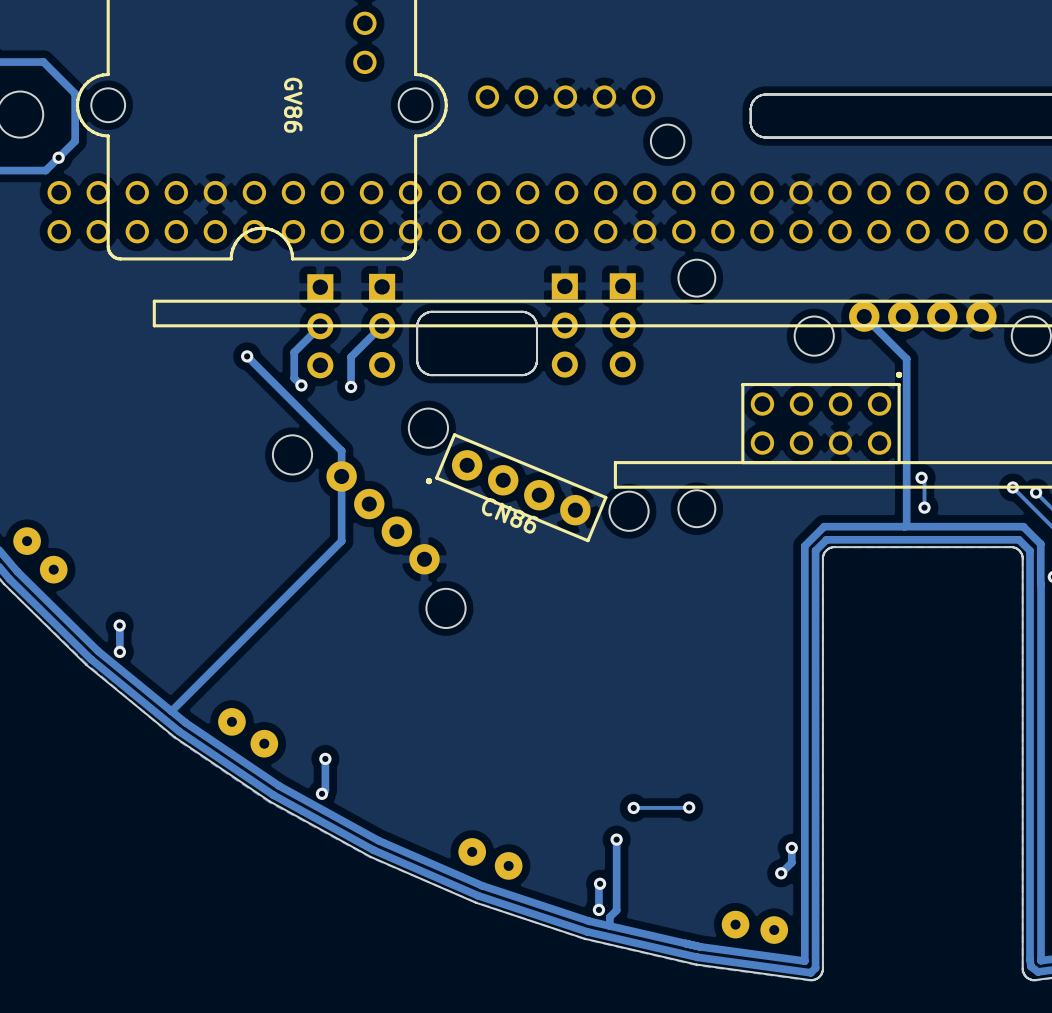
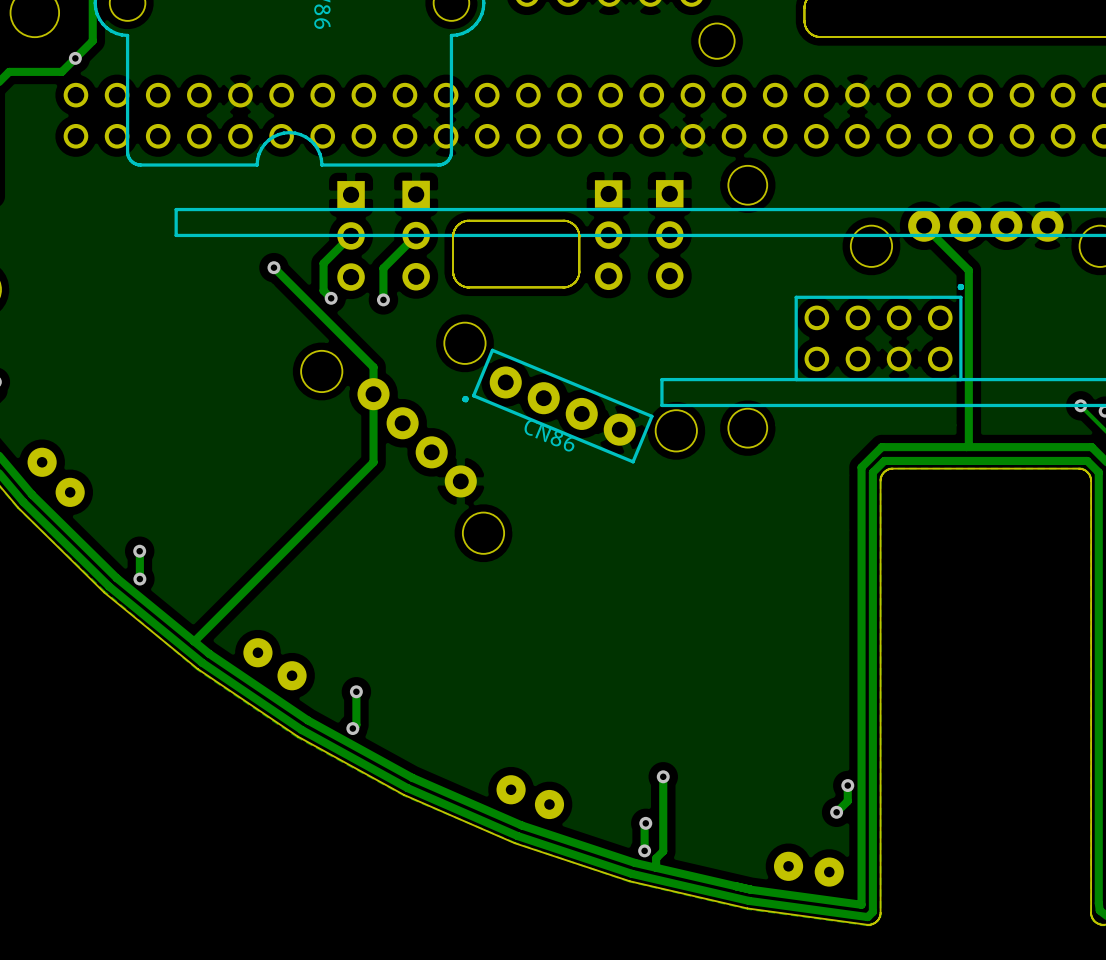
track: (921, 477) (924, 480) (924, 507) -> none
via: (921, 477) -> none
via: (924, 507) -> none
via: (633, 807) -> none
track: (689, 807) (633, 807) -> none
via: (689, 807) -> none

